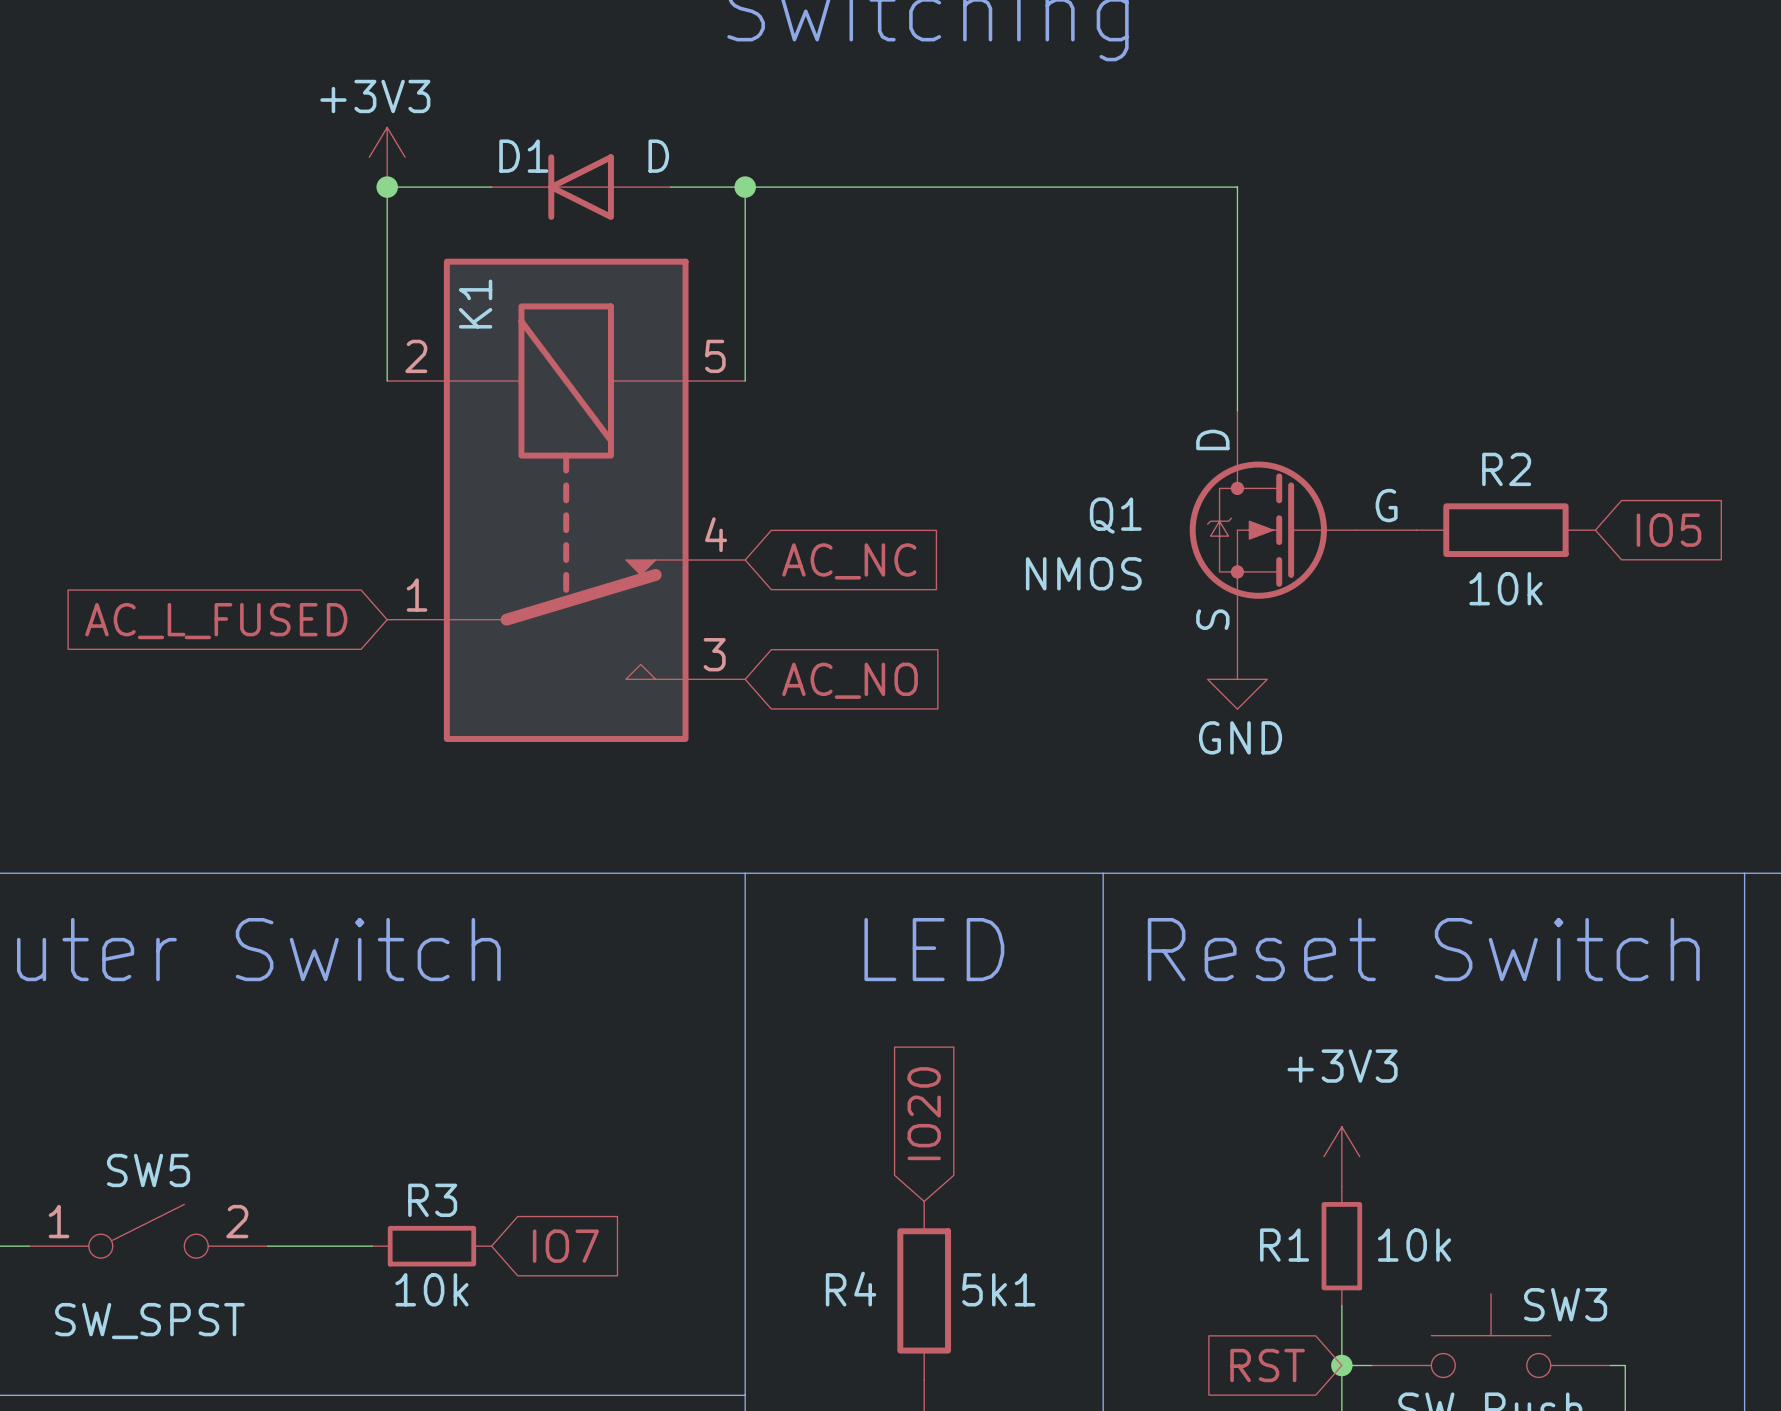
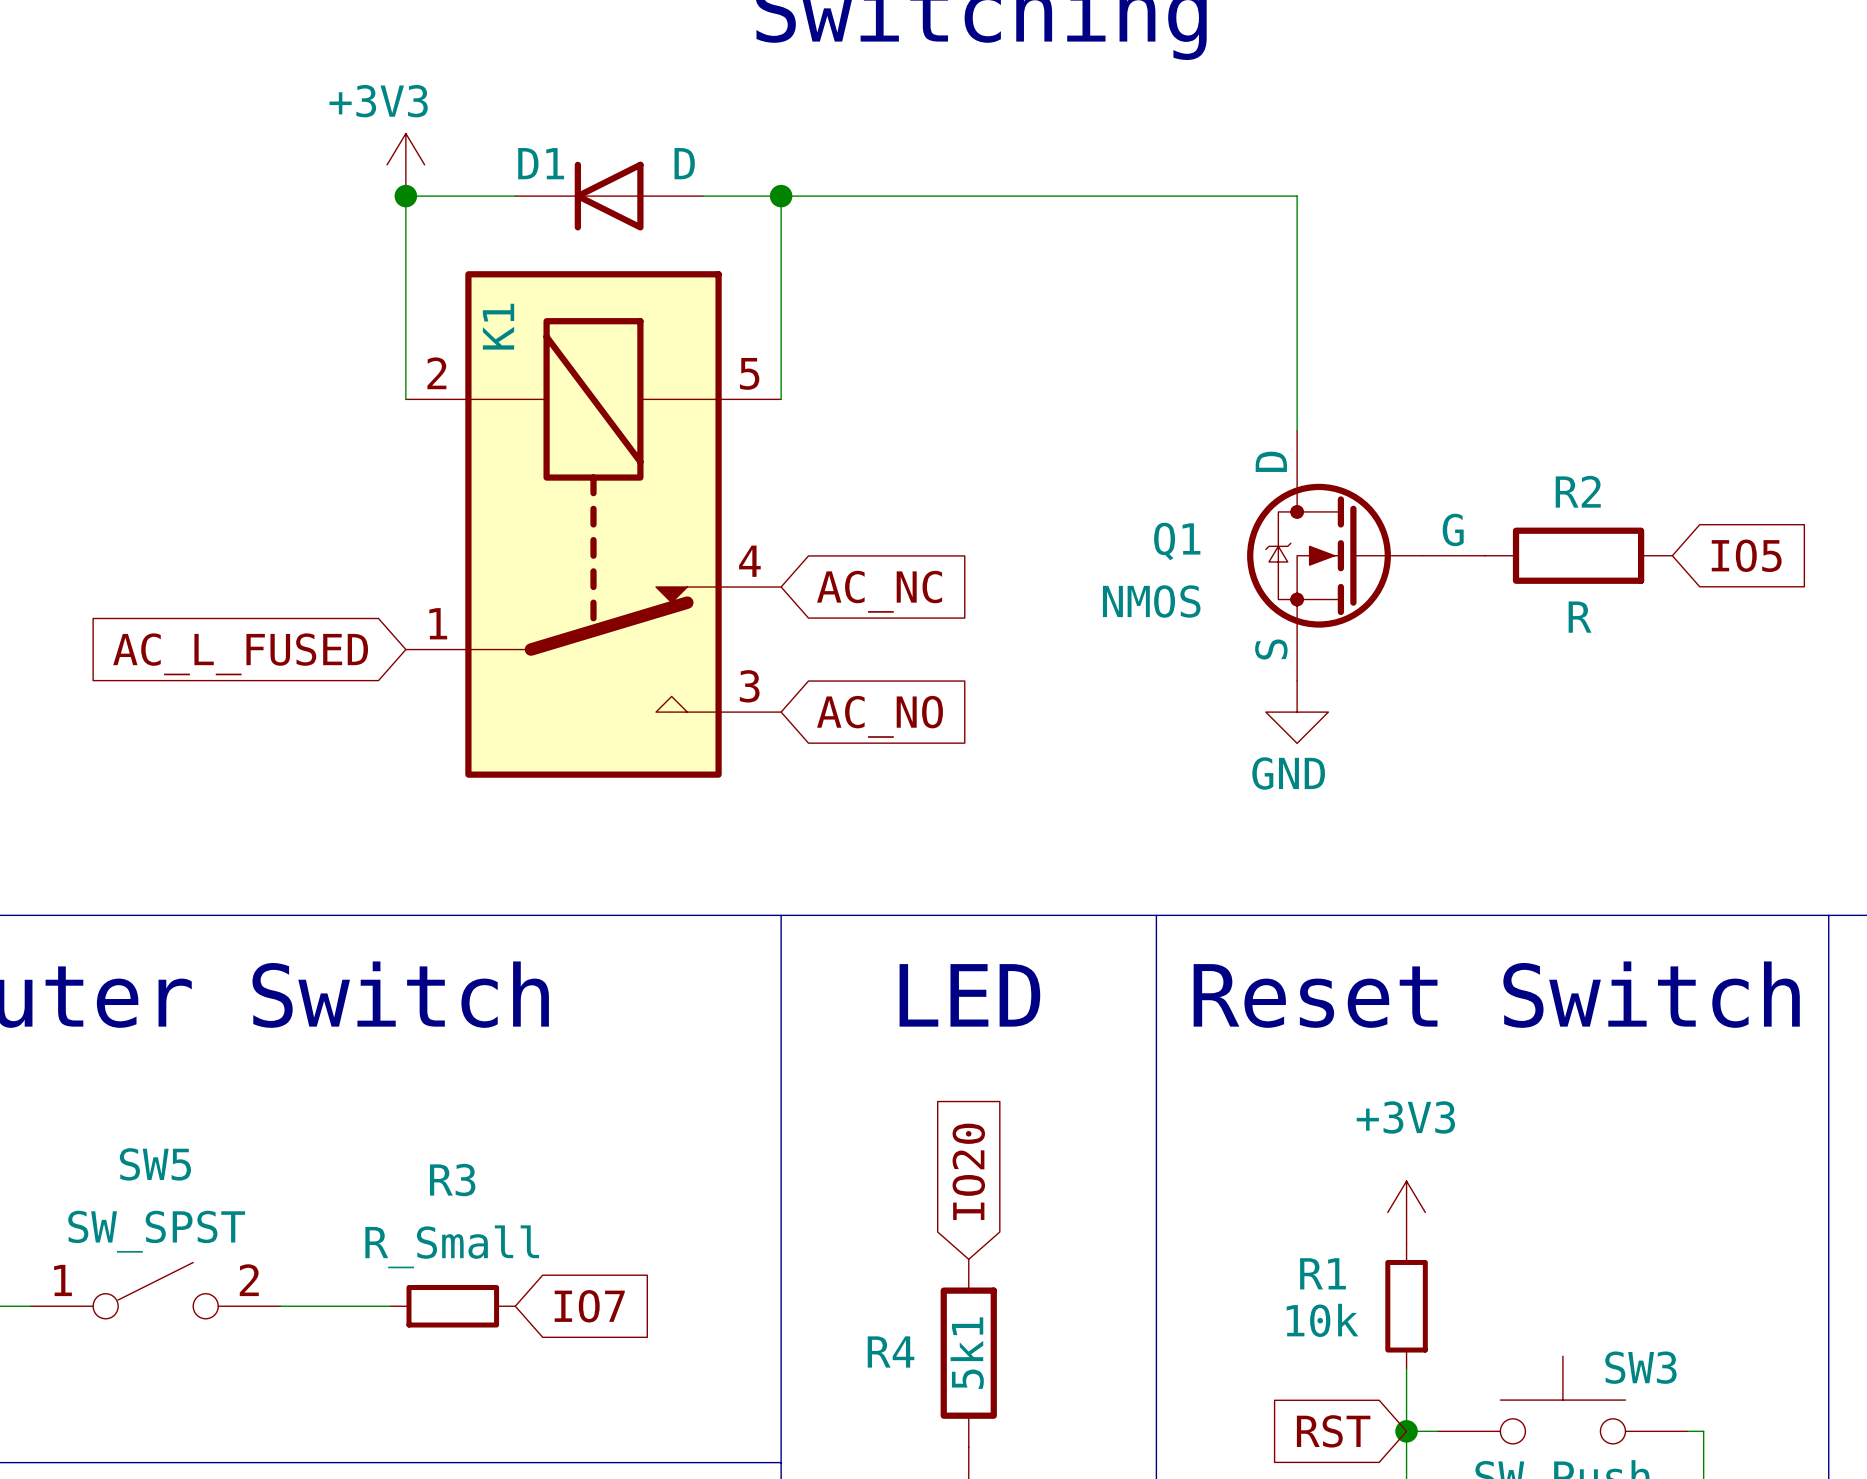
R2 value: 10k (1505, 588) -> R (1580, 617)
SW5 name position: SW5 (148, 1170) -> SW5 (155, 1164)
R3 name position: R3 (432, 1200) -> R3 (452, 1180)
R1 name position: R1 (1284, 1245) -> R1 (1322, 1273)
R1 value position: 10k (1414, 1245) -> 10k (1322, 1320)
R3 value: 10k (431, 1289) -> R_Small (452, 1246)
R4 value rotation: 0° (998, 1289) -> 90° counterclockwise (967, 1353)
SW5 value position: SW_SPST (149, 1321) -> SW_SPST (156, 1231)

